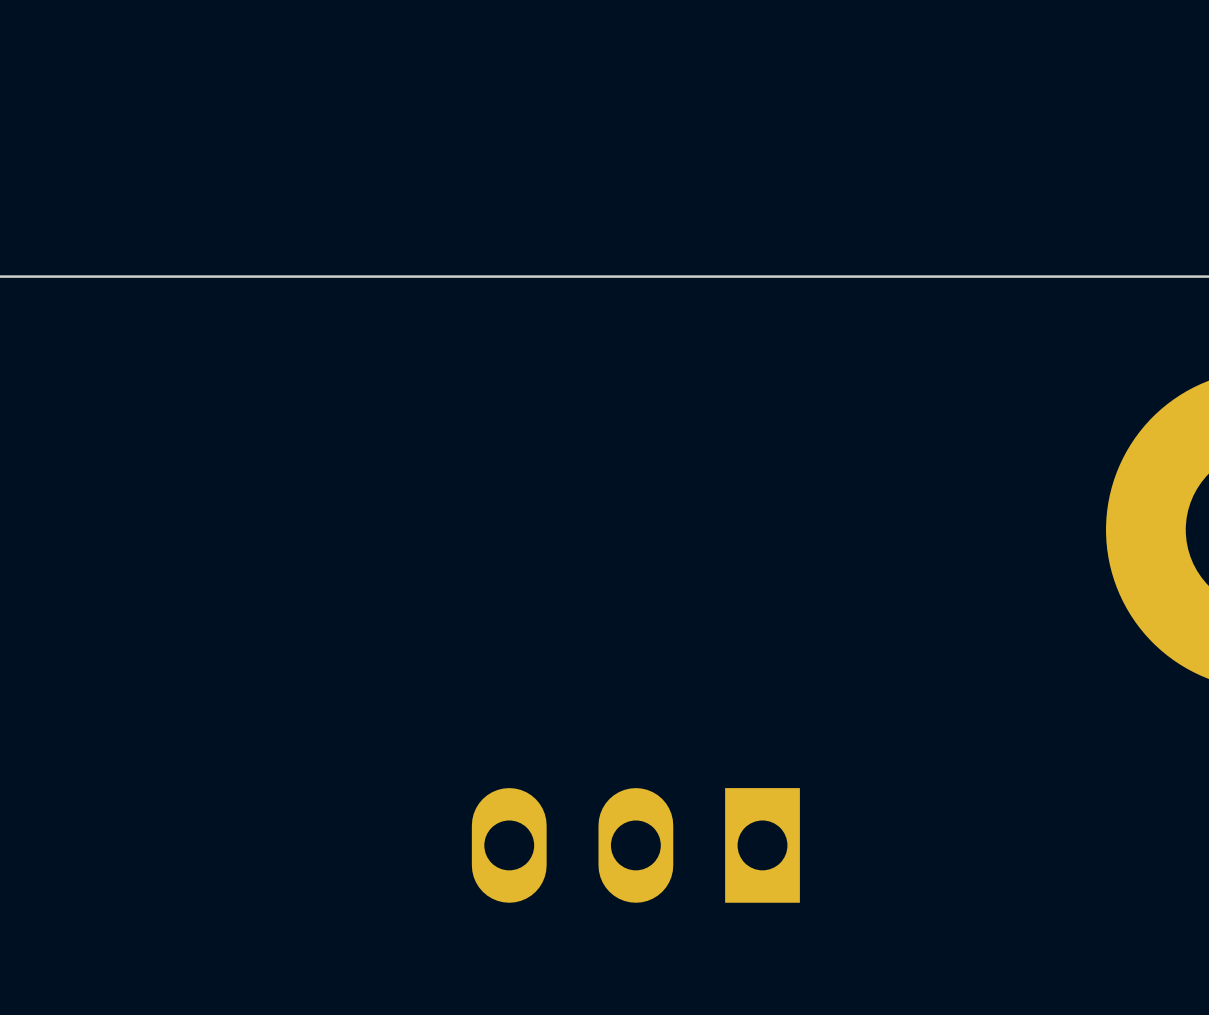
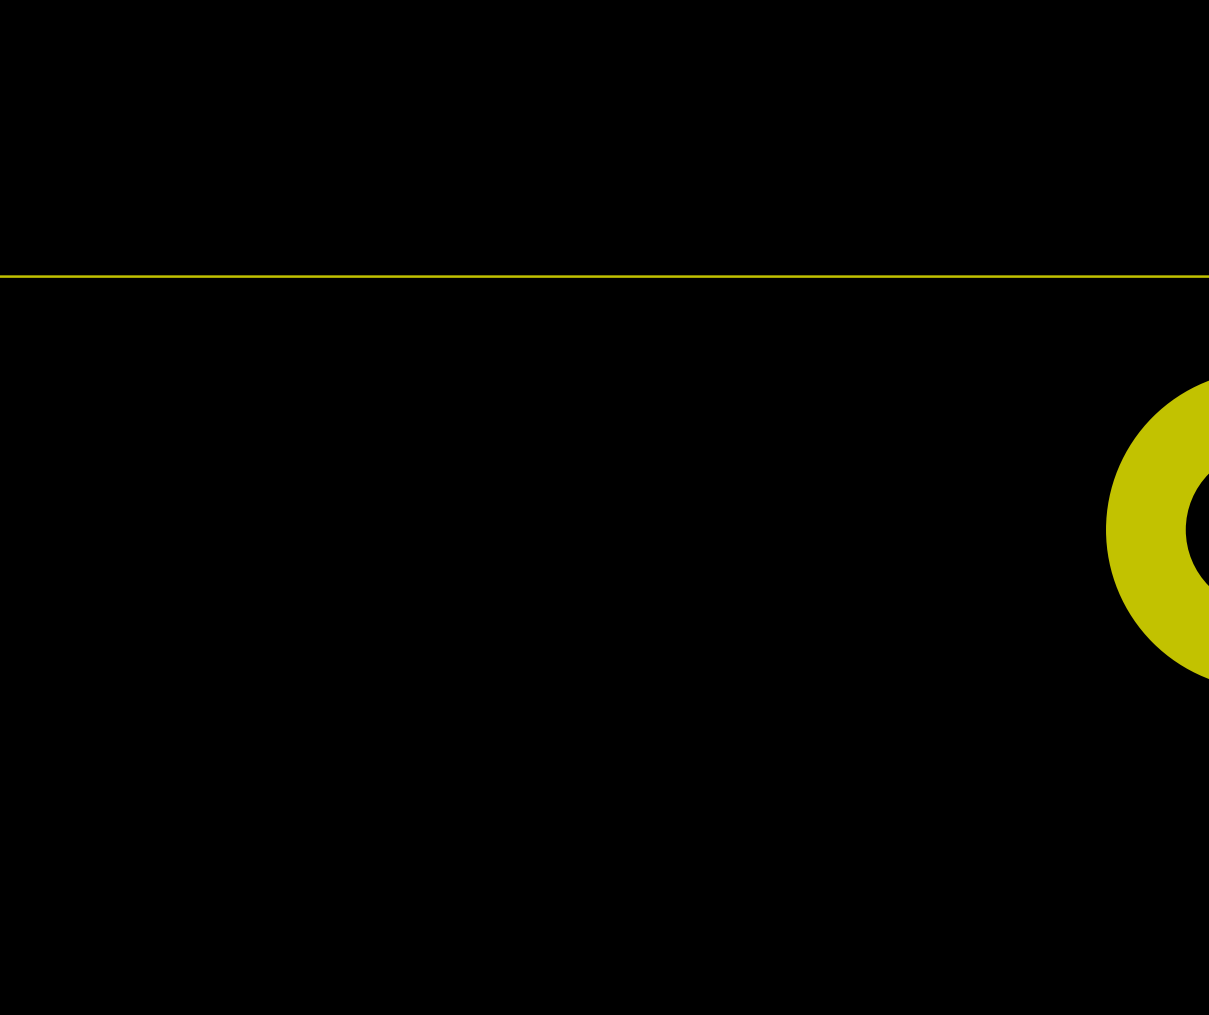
part: (635, 845) -> none

